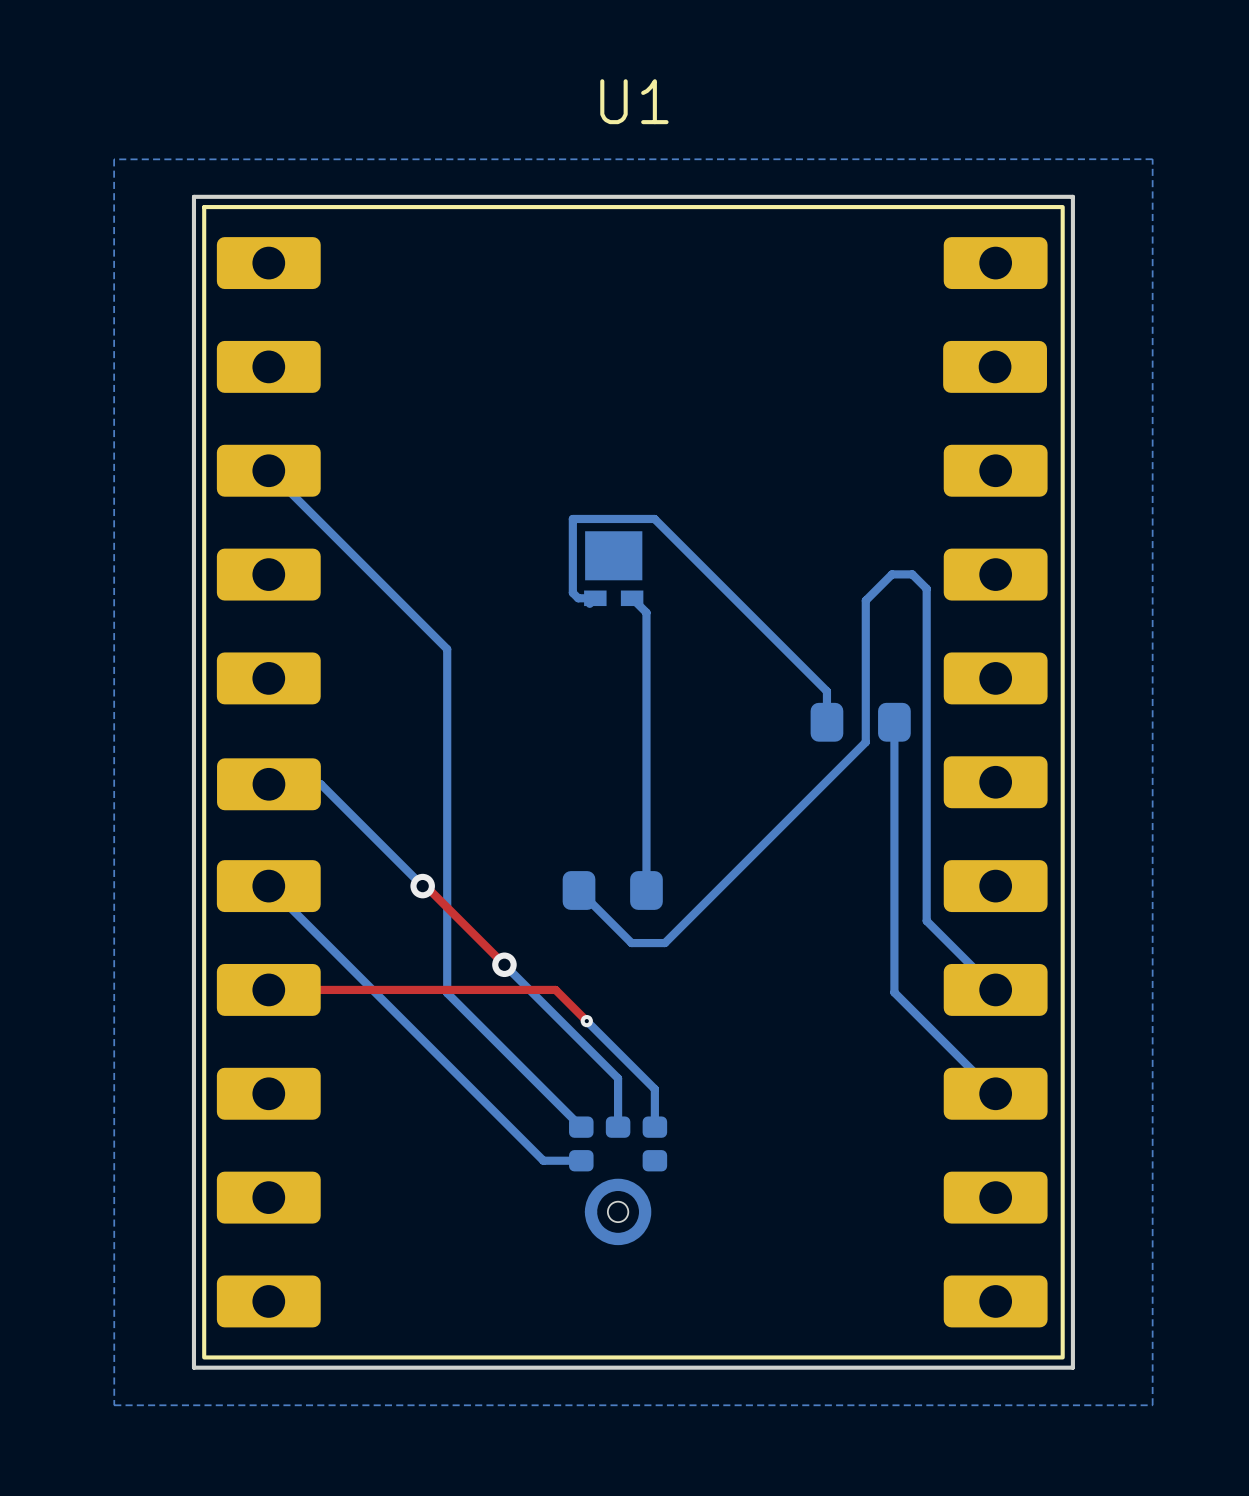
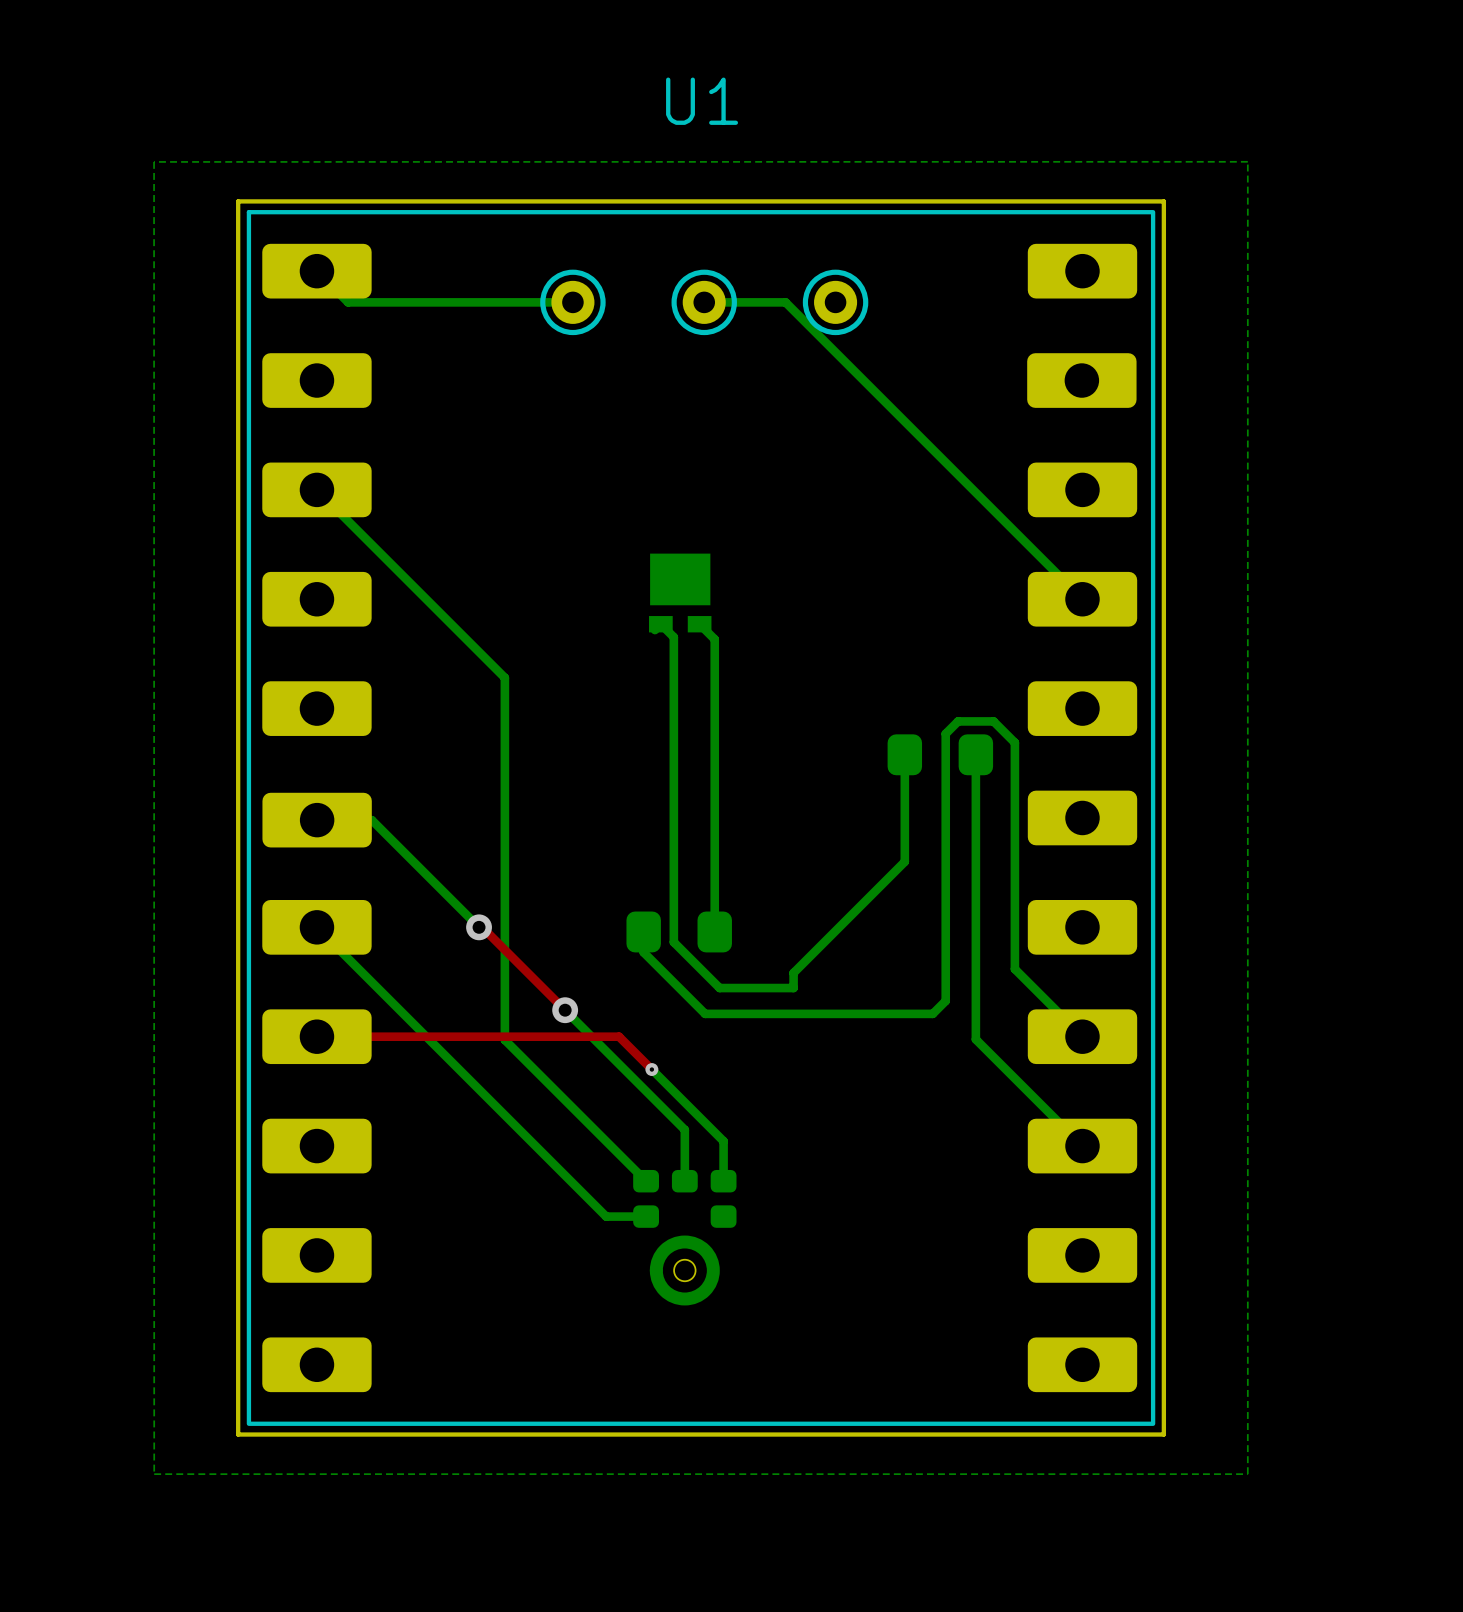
bottom track: none -> (316, 271) (348, 302) (572, 302)
part: none -> (572, 302)
bottom track: none -> (704, 302) (785, 302) (1082, 599)
part: none -> (704, 302)
part: none -> (835, 302)
bottom track: (595, 598) (578, 598) (572, 592) (572, 518) (654, 518) (826, 691) (826, 722) -> (660, 624) (673, 637) (673, 942) (719, 988) (793, 988) (793, 972) (904, 861) (904, 754)
bottom track: (865, 702) (865, 600) (891, 574) (912, 574) (926, 588) (926, 920) (931, 925) -> (945, 733) (958, 721) (993, 721) (1014, 742) (1014, 969)
bottom track: (865, 742) (664, 943) (631, 943) (579, 890) -> (945, 775) (945, 1000) (932, 1013) (705, 1013) (643, 952) (643, 931)

